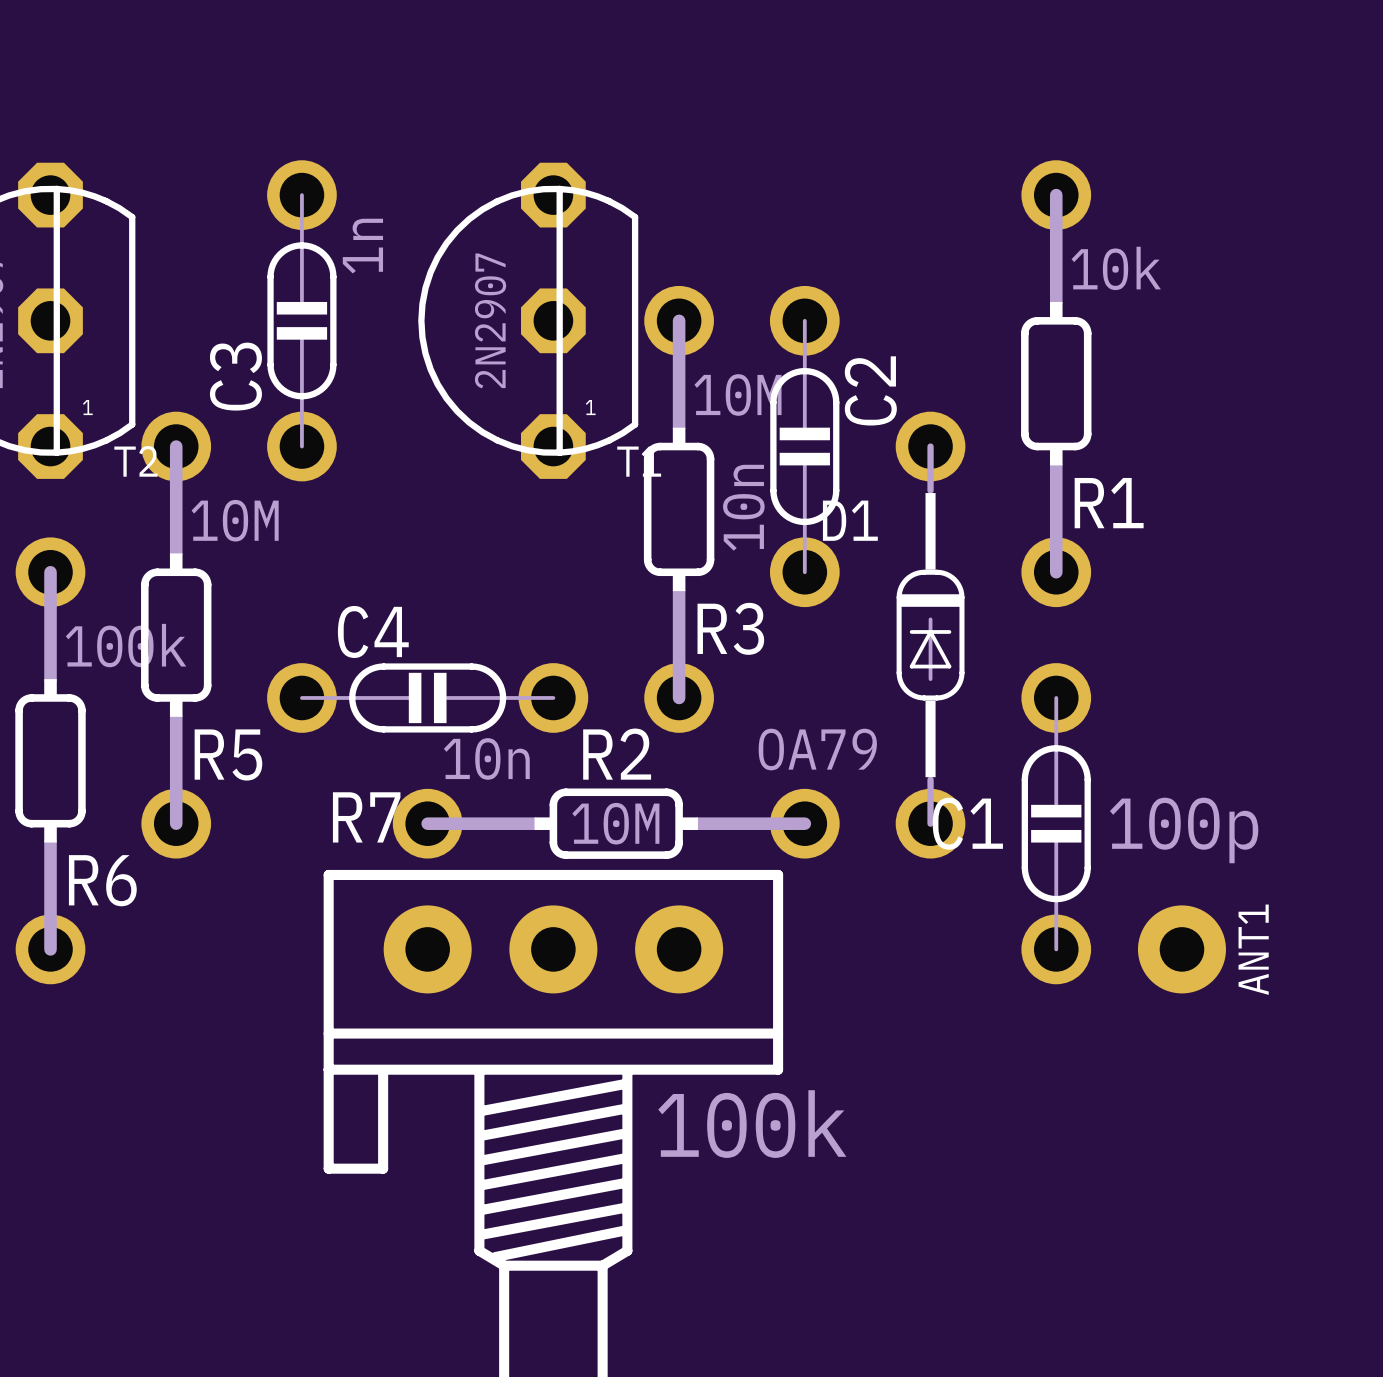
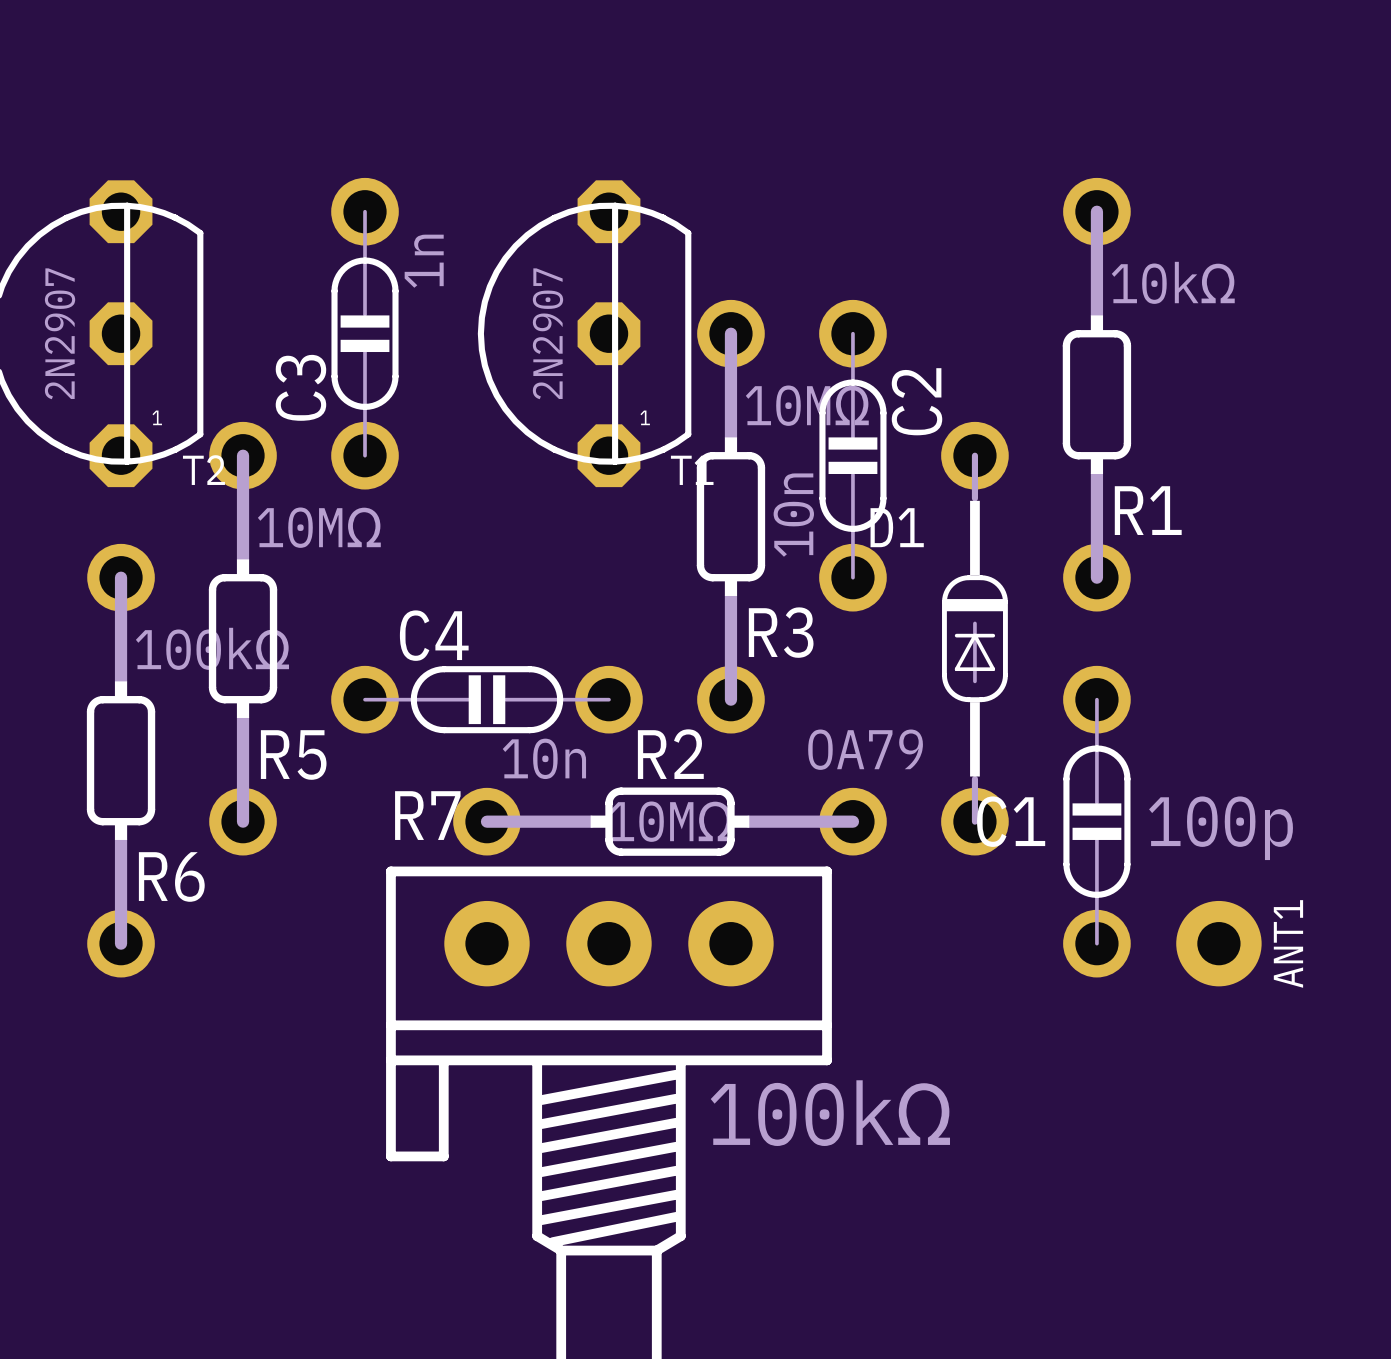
R1 value: 10k (1116, 268) -> 10kΩ (1173, 282)
R3 value: 10M (737, 394) -> 10MΩ (807, 405)
R5 value: 10M (235, 520) -> 10MΩ (319, 527)
R6 value: 100k (126, 645) -> 100kΩ (212, 648)
R2 value: 10M (615, 823) -> 10MΩ (670, 821)
R7 value: 100k (752, 1124) -> 100kΩ (830, 1113)

